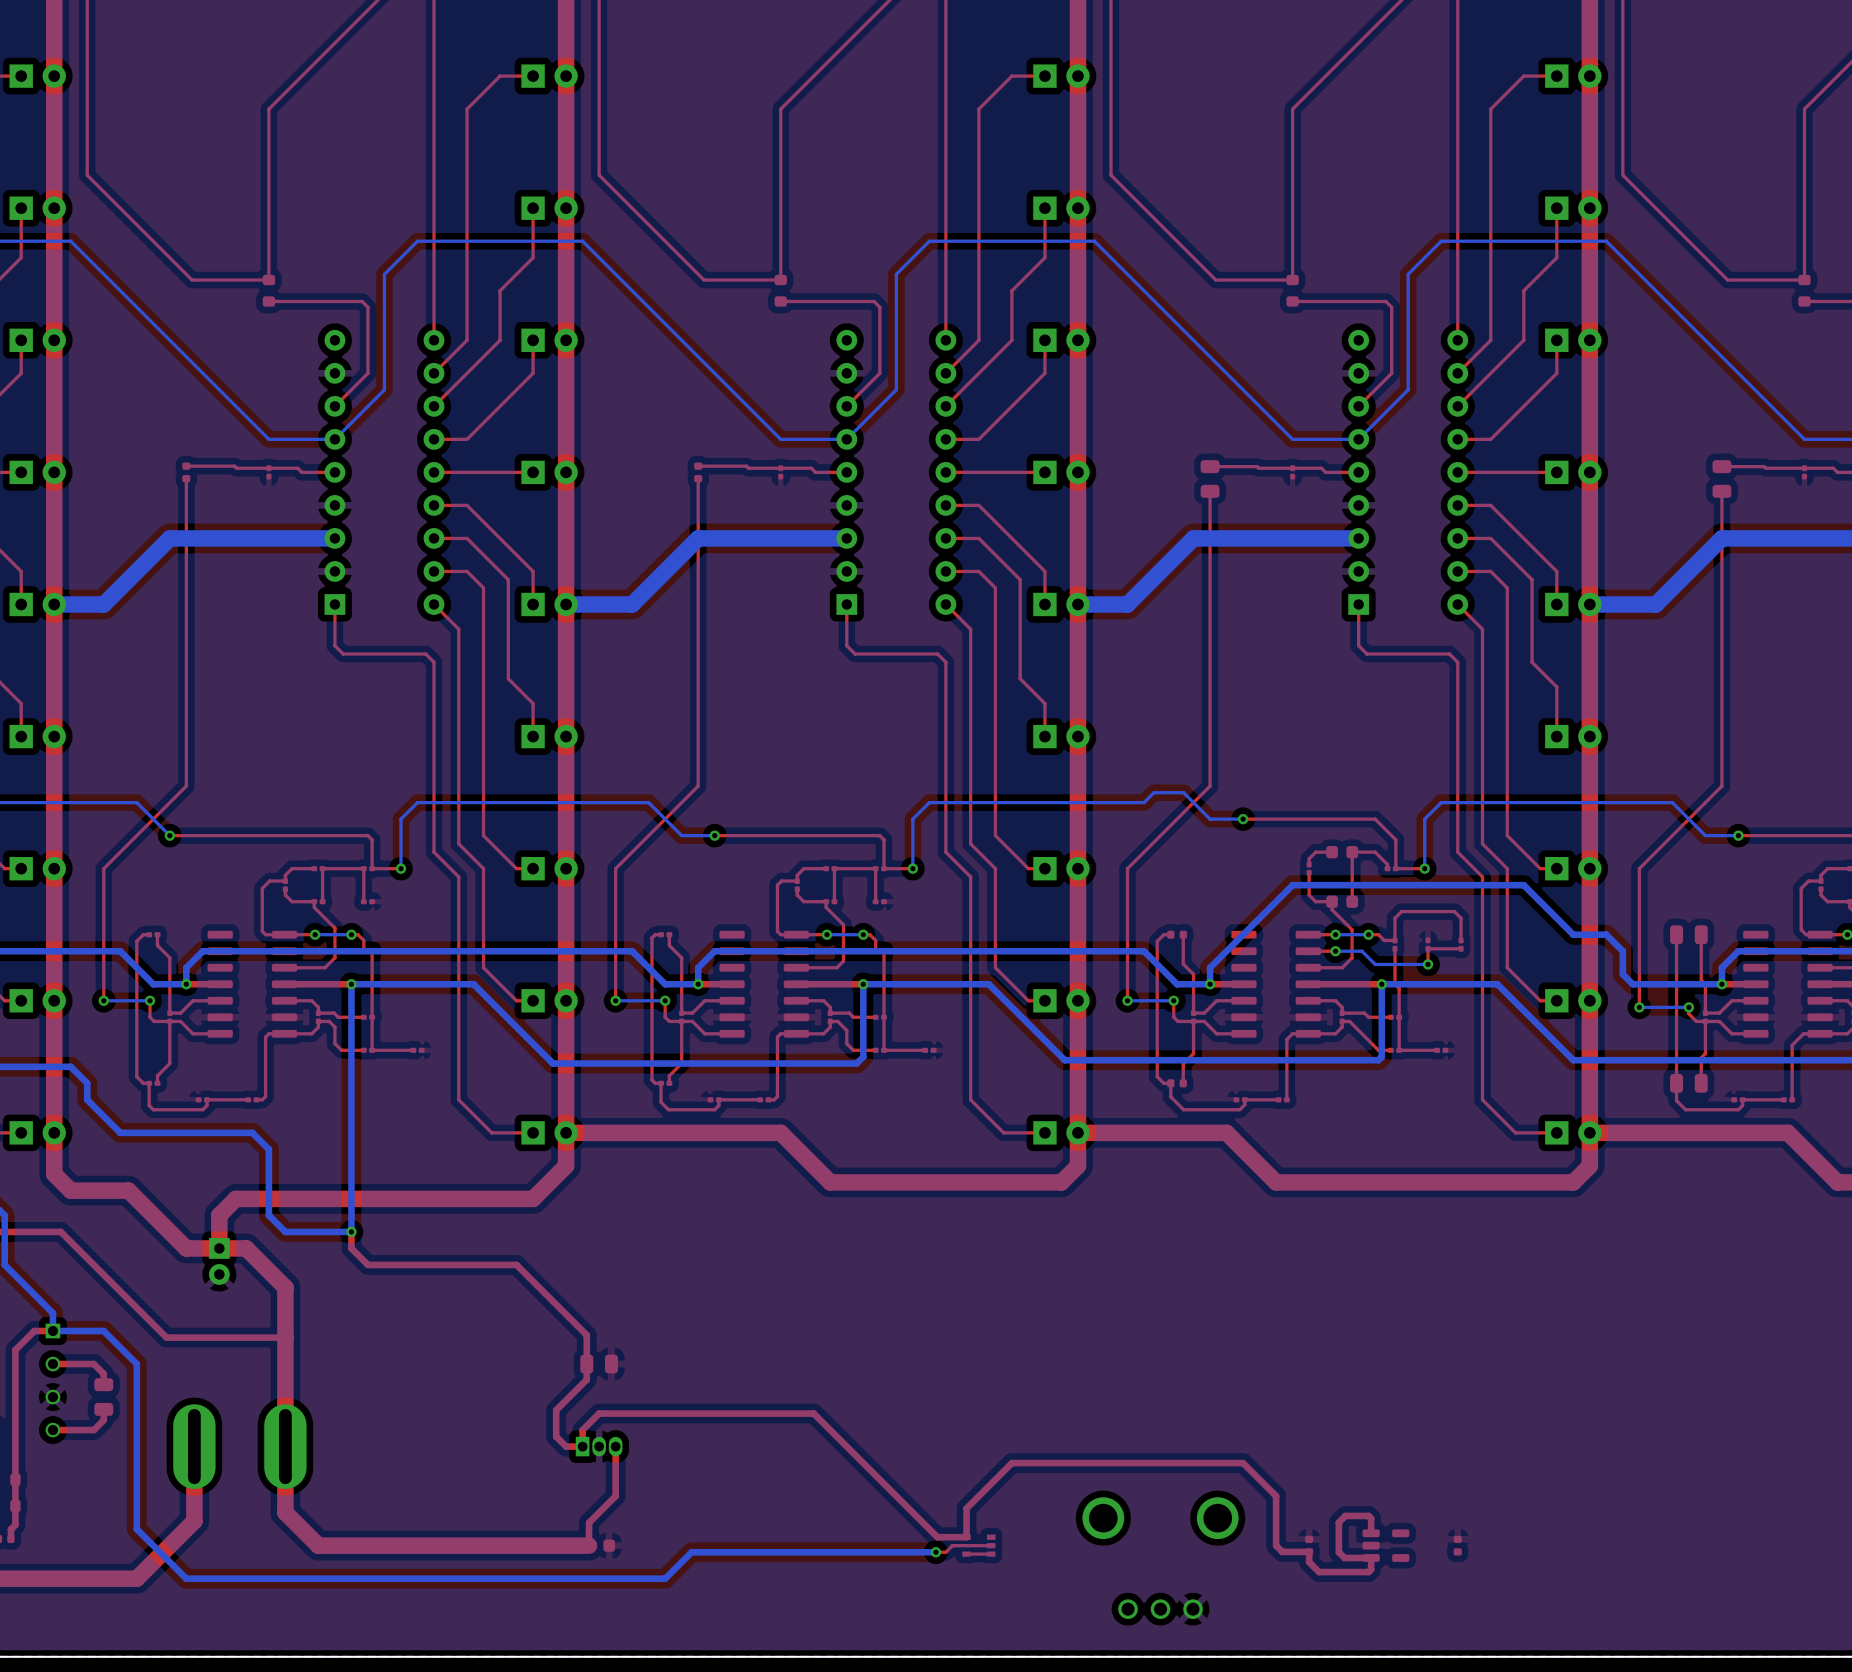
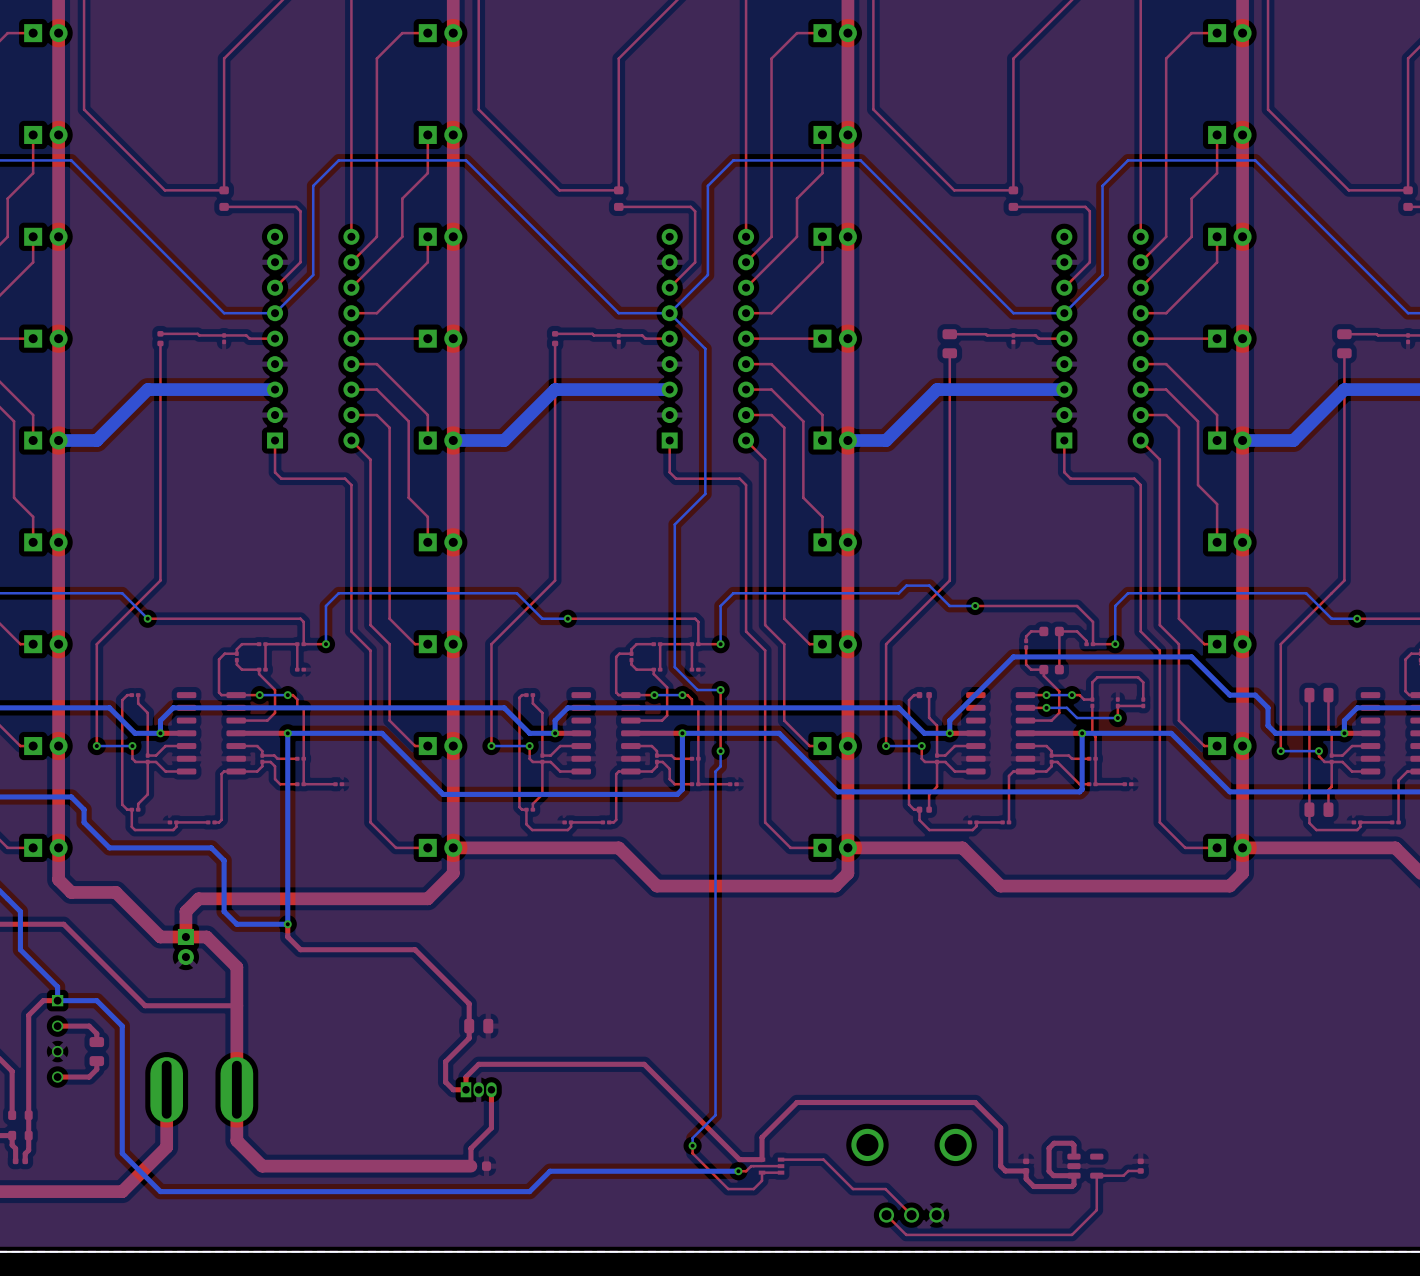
bottom track: none -> (669, 313) (705, 348) (705, 493) (674, 524) (674, 667) (697, 690) (720, 690)
top track: none -> (720, 690) (720, 751)
via: none -> (720, 690)
bottom track: none -> (720, 751) (720, 766) (715, 771) (715, 1115) (692, 1138) (692, 1145)
via: none -> (720, 751)
top track: none -> (692, 1145) (692, 1153) (728, 1189) (753, 1189) (762, 1180) (762, 1172)
via: none -> (692, 1145)
top track: none -> (781, 1159) (823, 1159) (853, 1189) (885, 1189) (911, 1215)
top track: none -> (1140, 1170) (1128, 1170) (1123, 1175) (1096, 1175) (1096, 1210) (1071, 1234) (906, 1234) (886, 1215)

